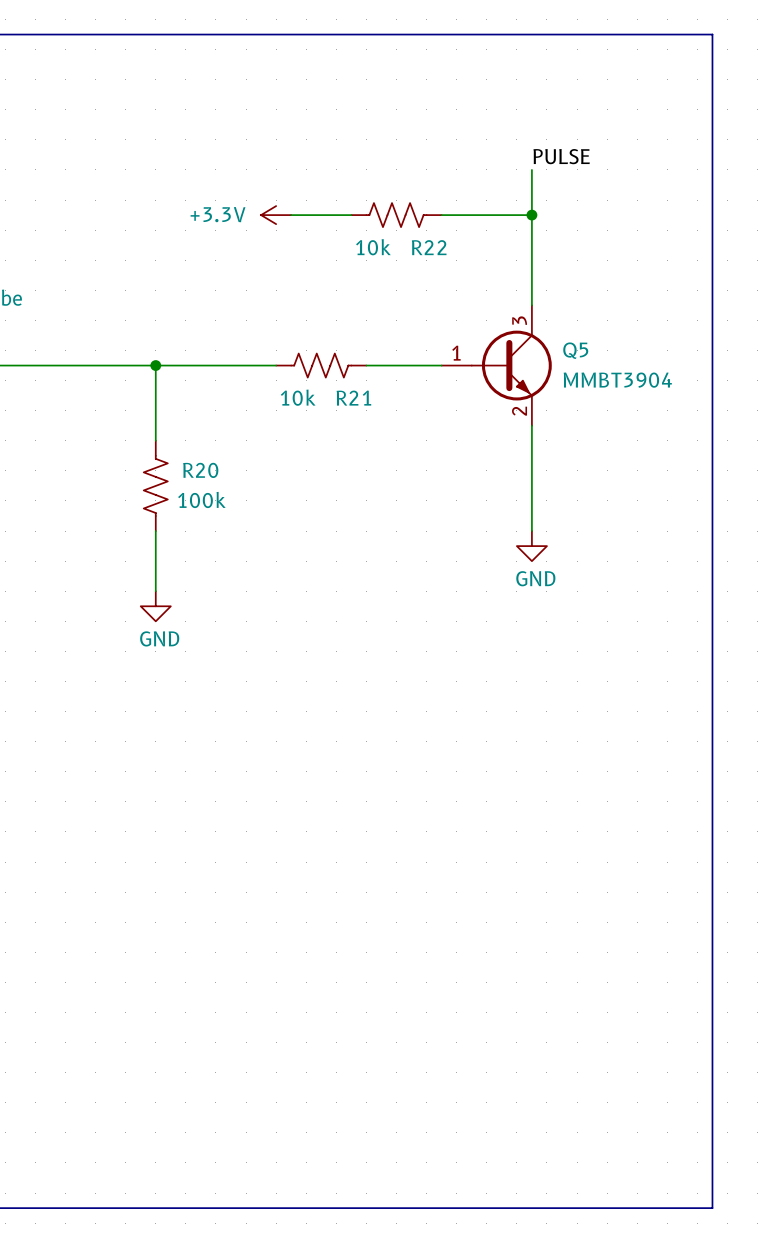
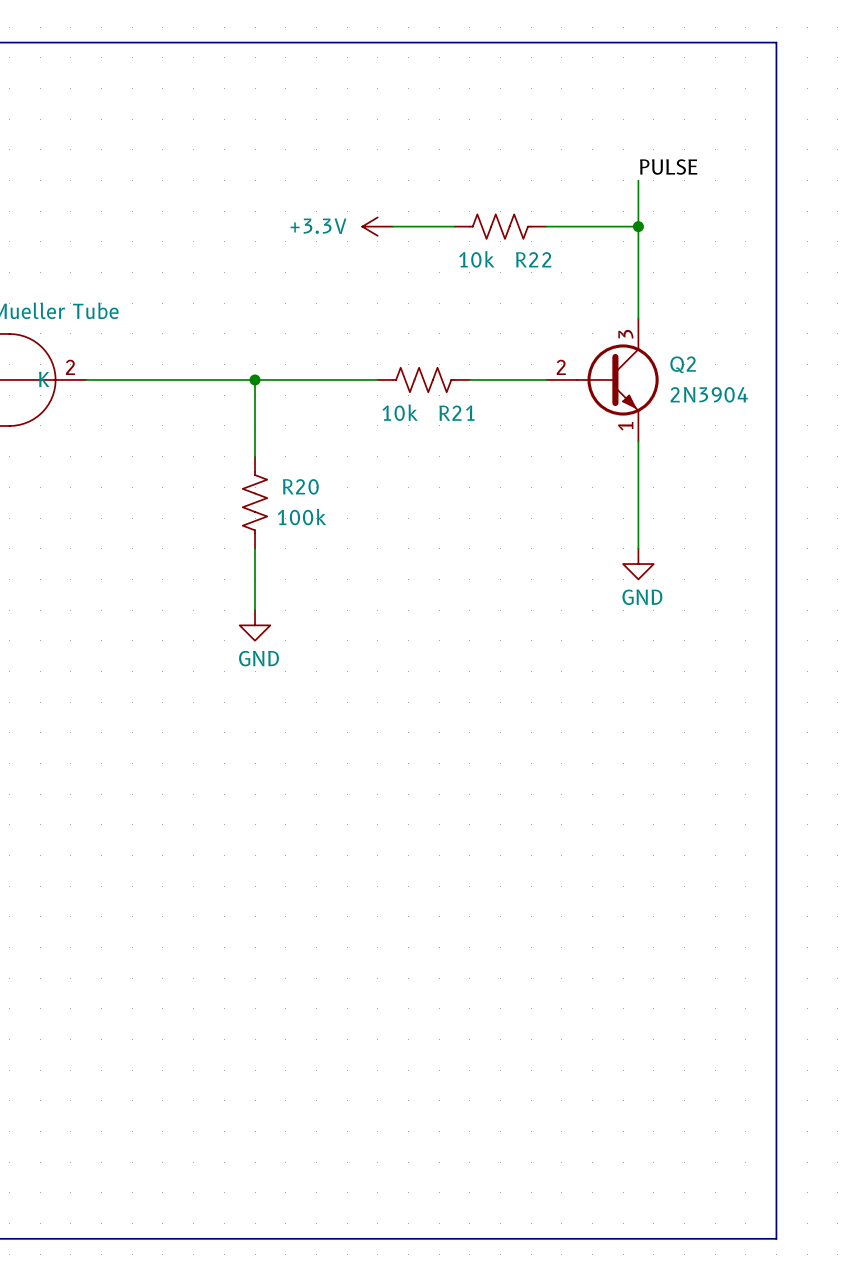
line: (667, 34) (712, 34) (712, 1208) (667, 1208) -> (776, 42) (776, 1238)
Q5 name: Q5 (575, 350) -> Q2 (683, 364)
Q5 pin number: 1 (456, 353) -> 2 (561, 367)
Q5 value: MMBT3904 (617, 380) -> 2N3904 (709, 394)
Q5 pin number: 2 (519, 411) -> 1 (625, 426)

